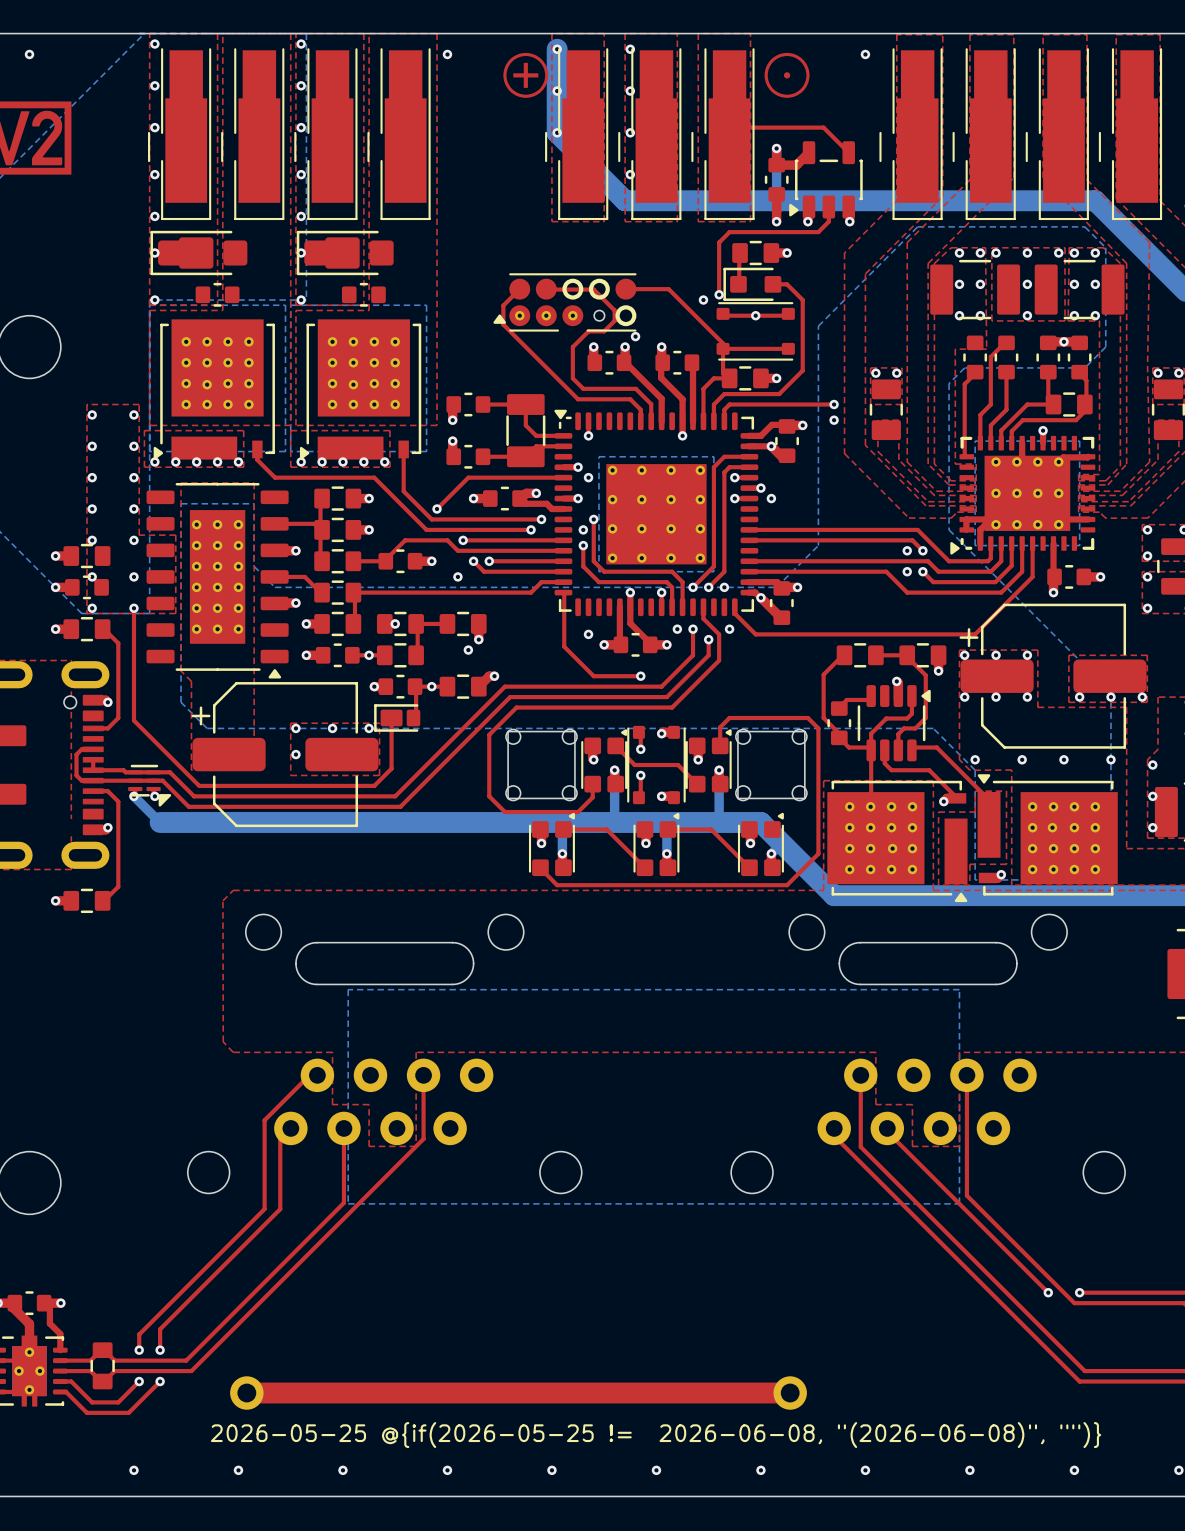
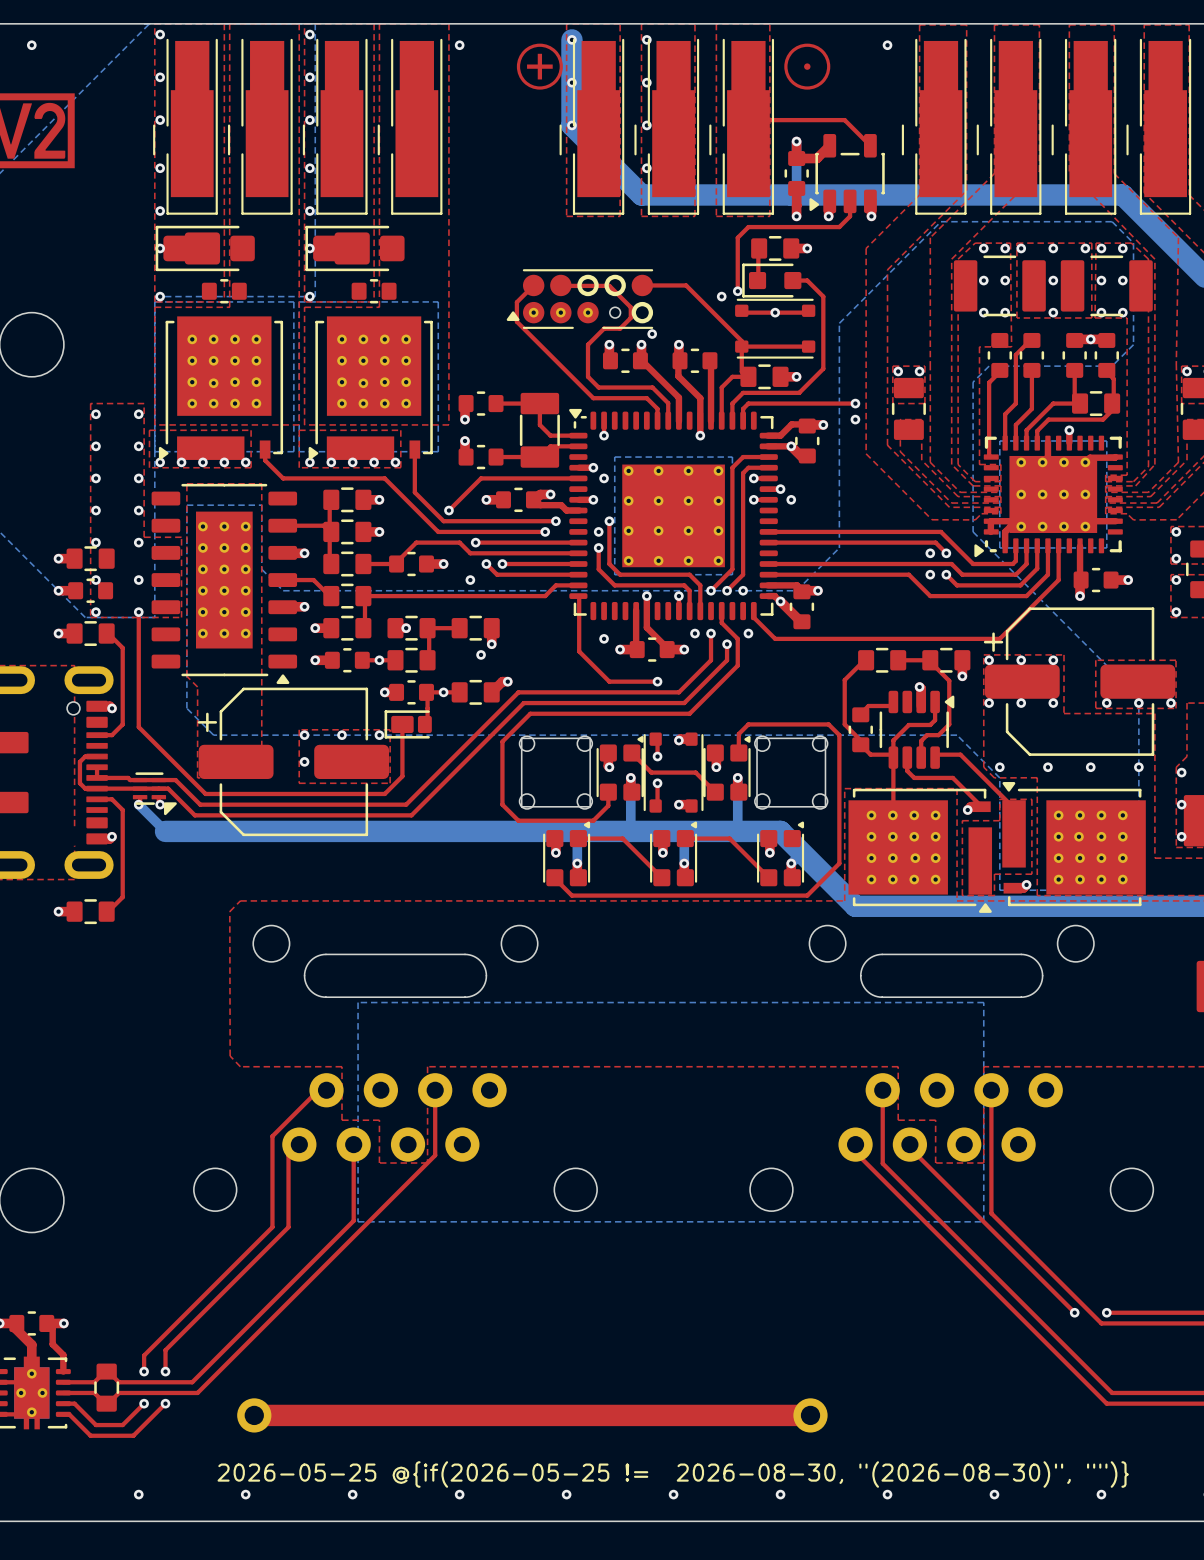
drawing shape: [210, 1422, 1102, 1449] -> [217, 1461, 1129, 1488]

